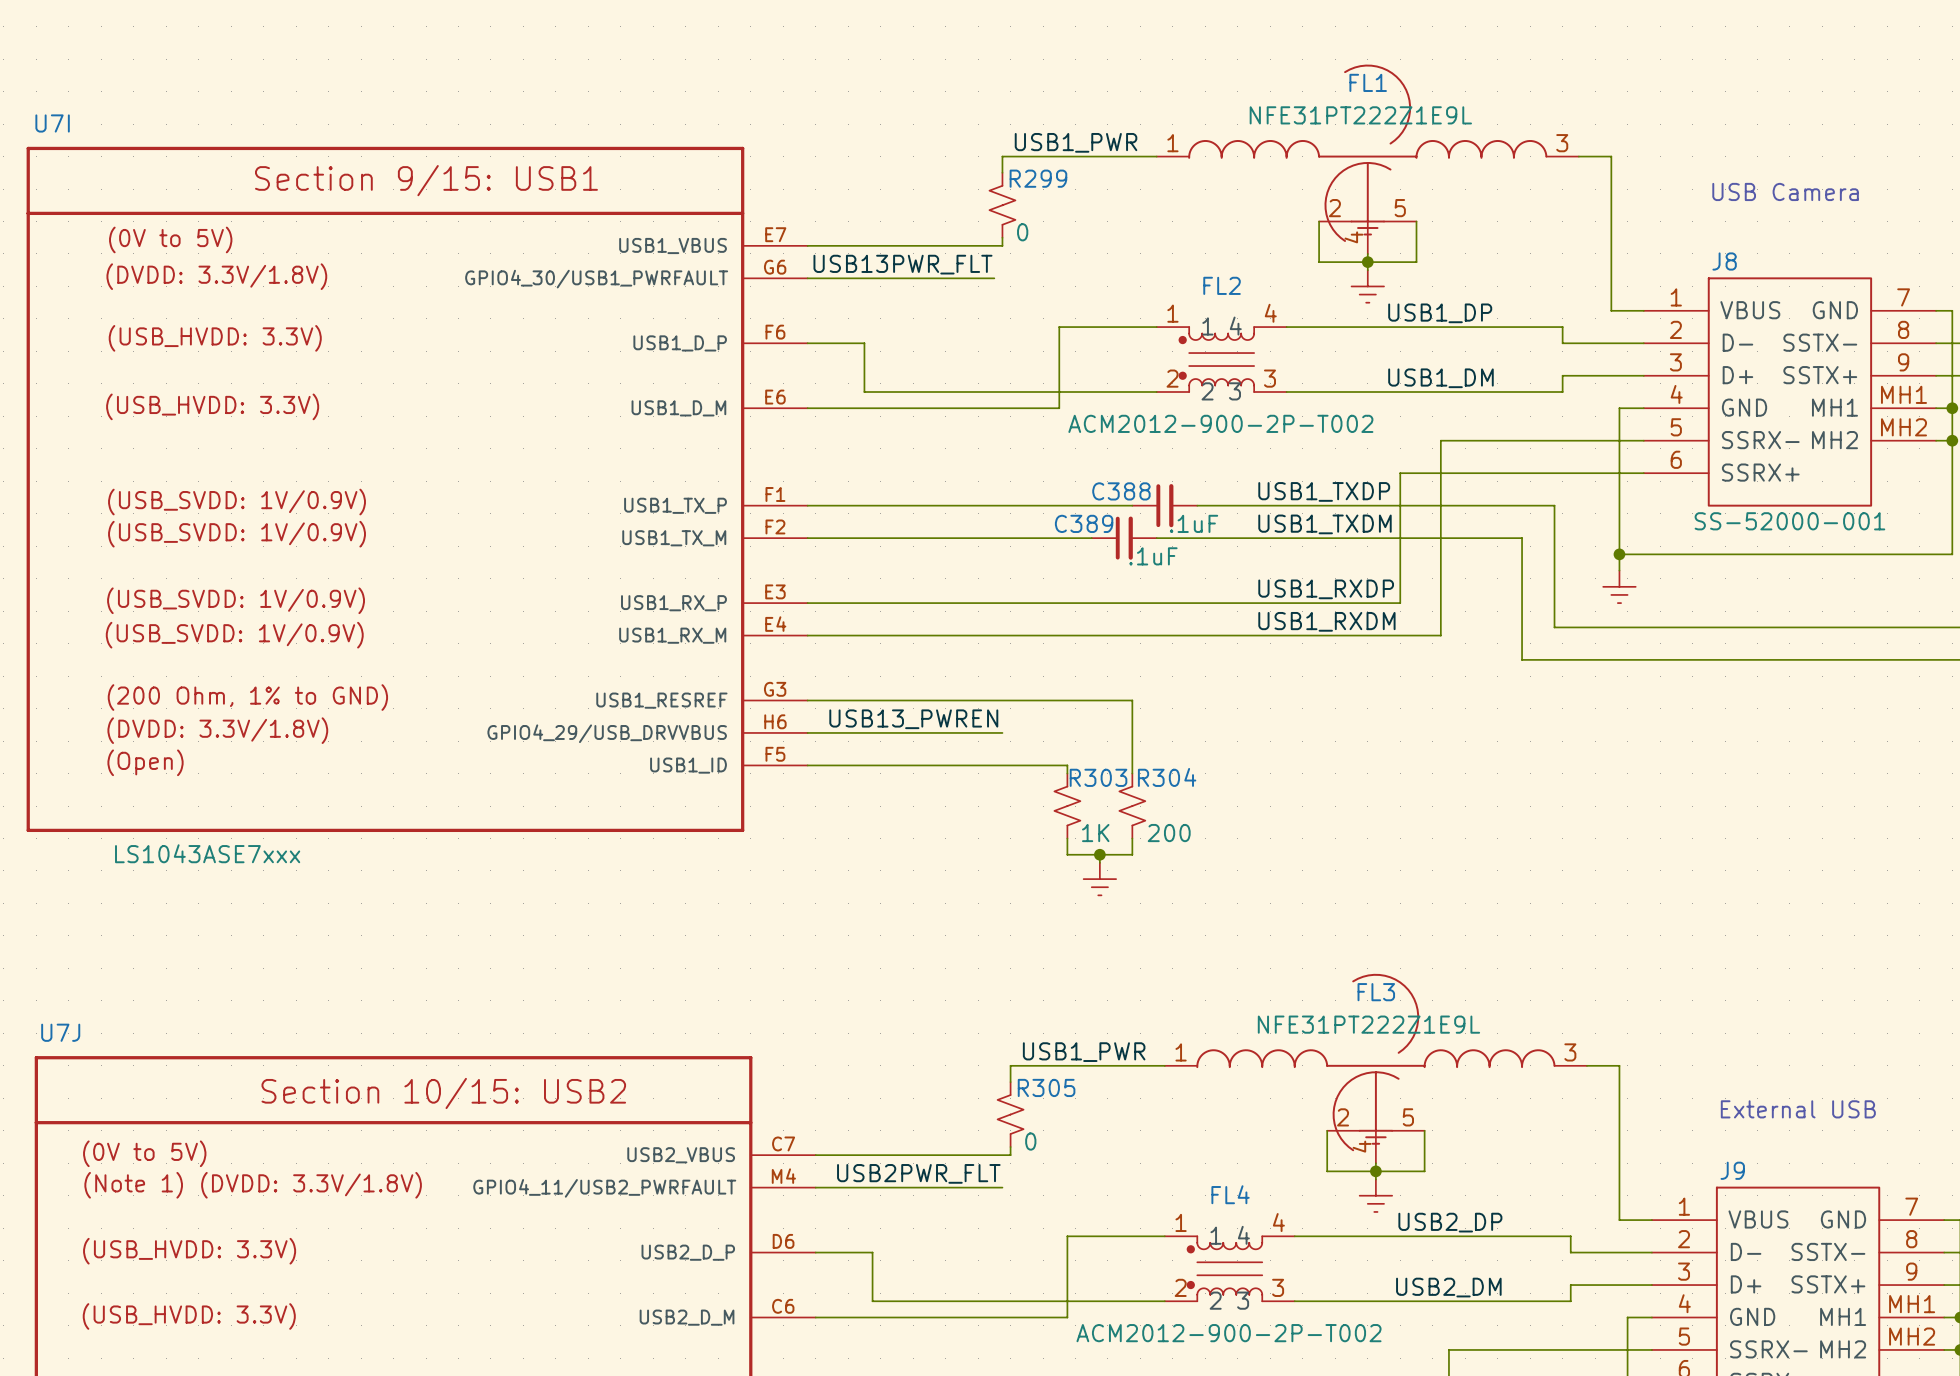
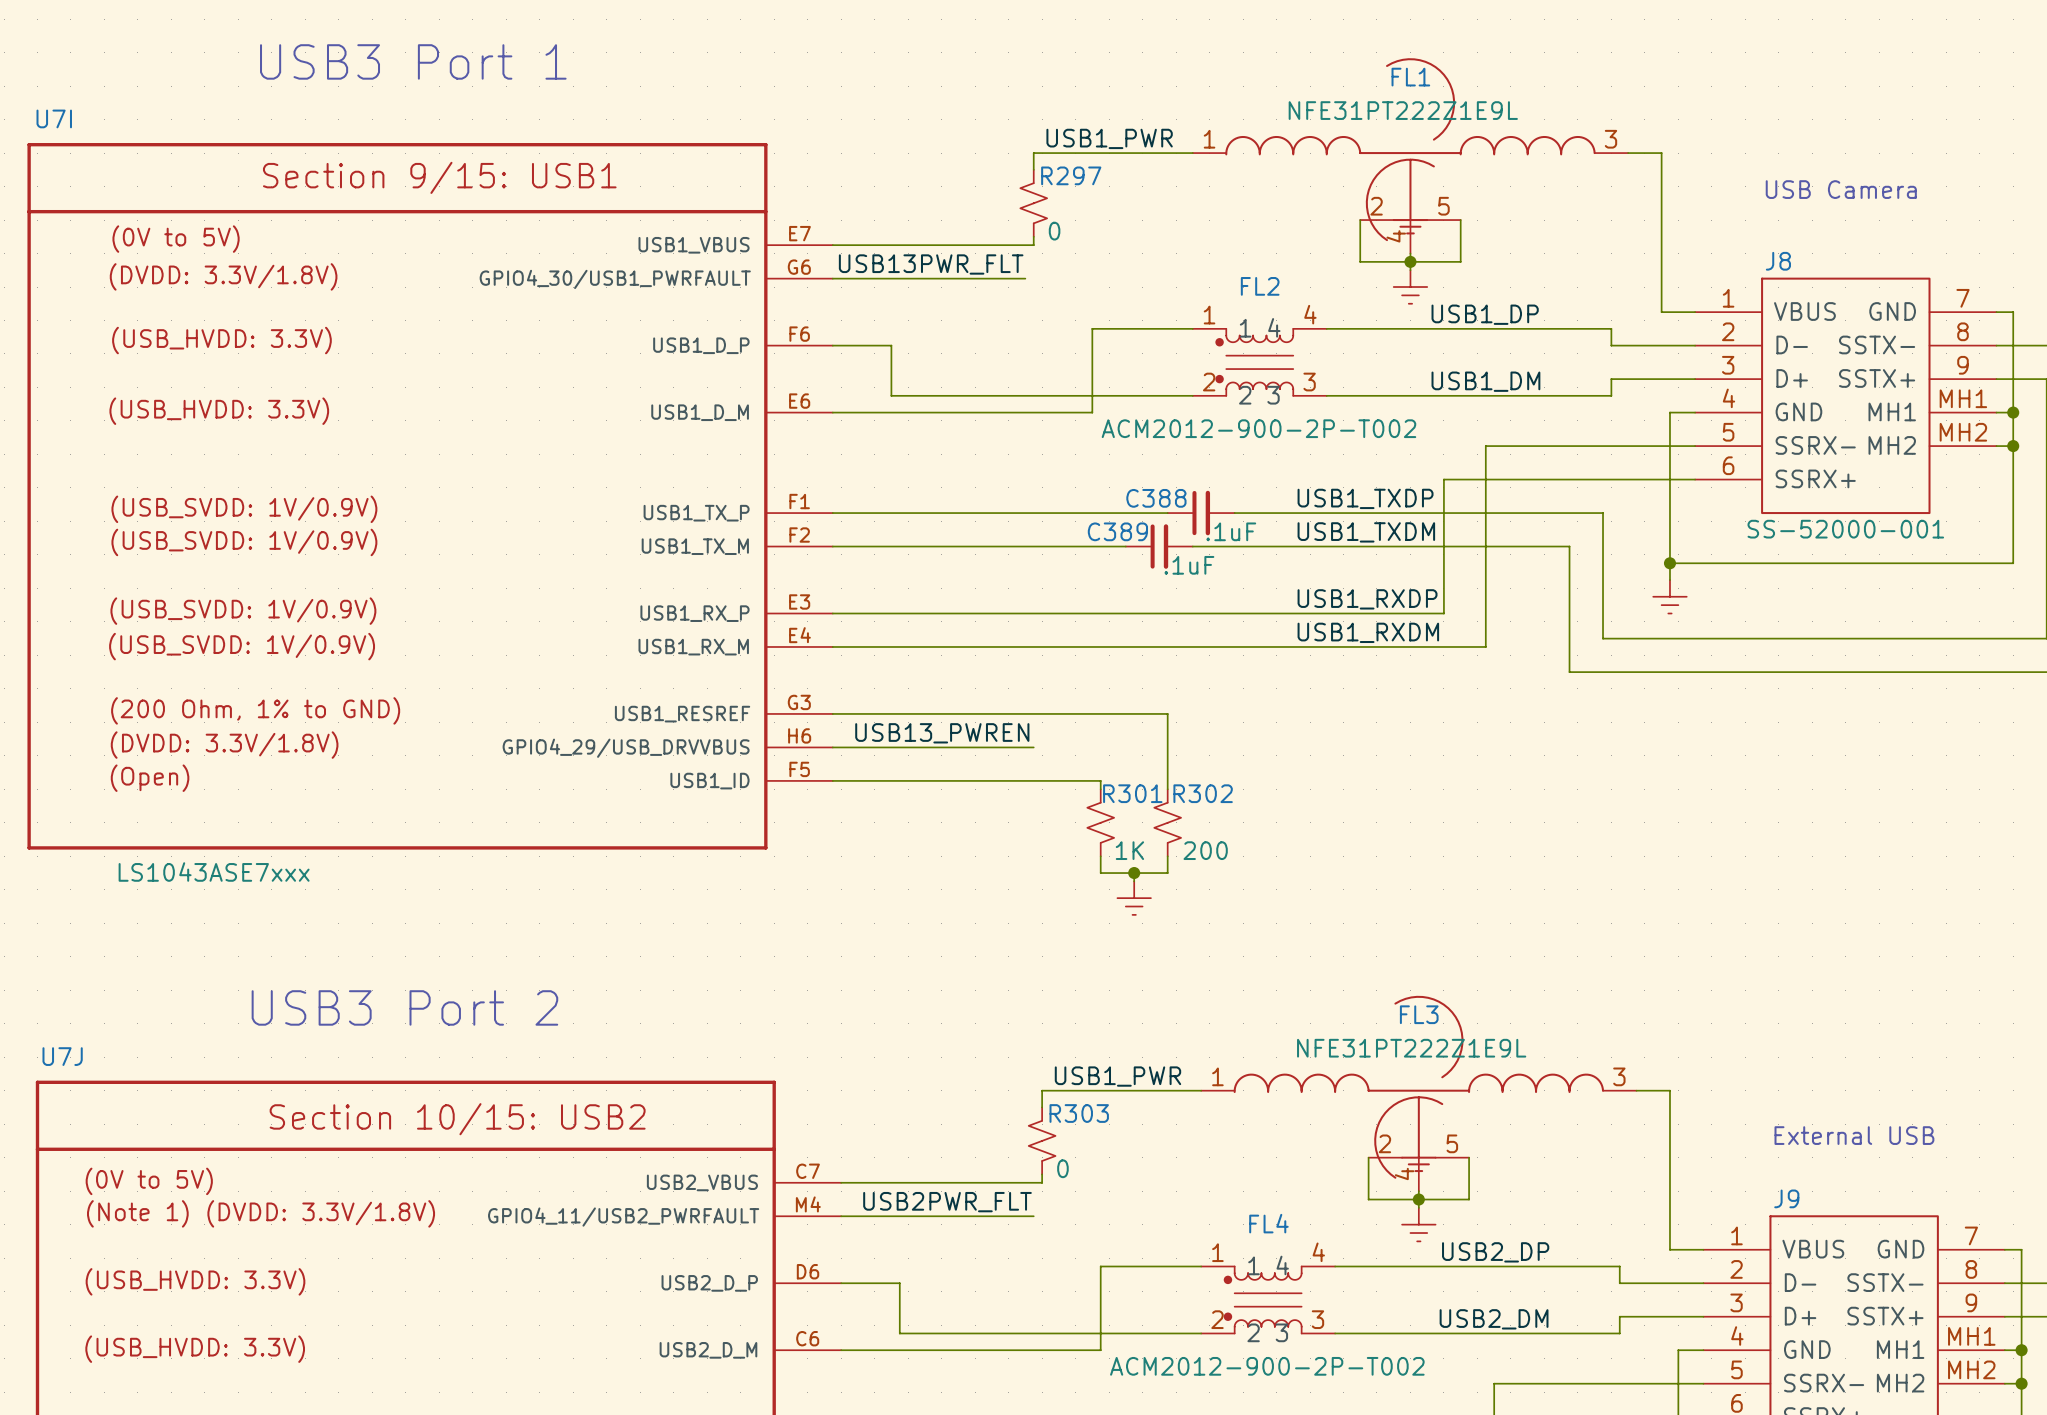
text: none -> USB3 Port 1 (413, 61)
R299 name: R299 (1038, 178) -> R297 (1071, 175)
R303 name: R303 (1098, 777) -> R301 (1132, 793)
R304 name: R304 (1167, 777) -> R302 (1203, 793)
text: none -> USB3 Port 2 (404, 1007)
R305 name: R305 (1046, 1087) -> R303 (1079, 1113)

